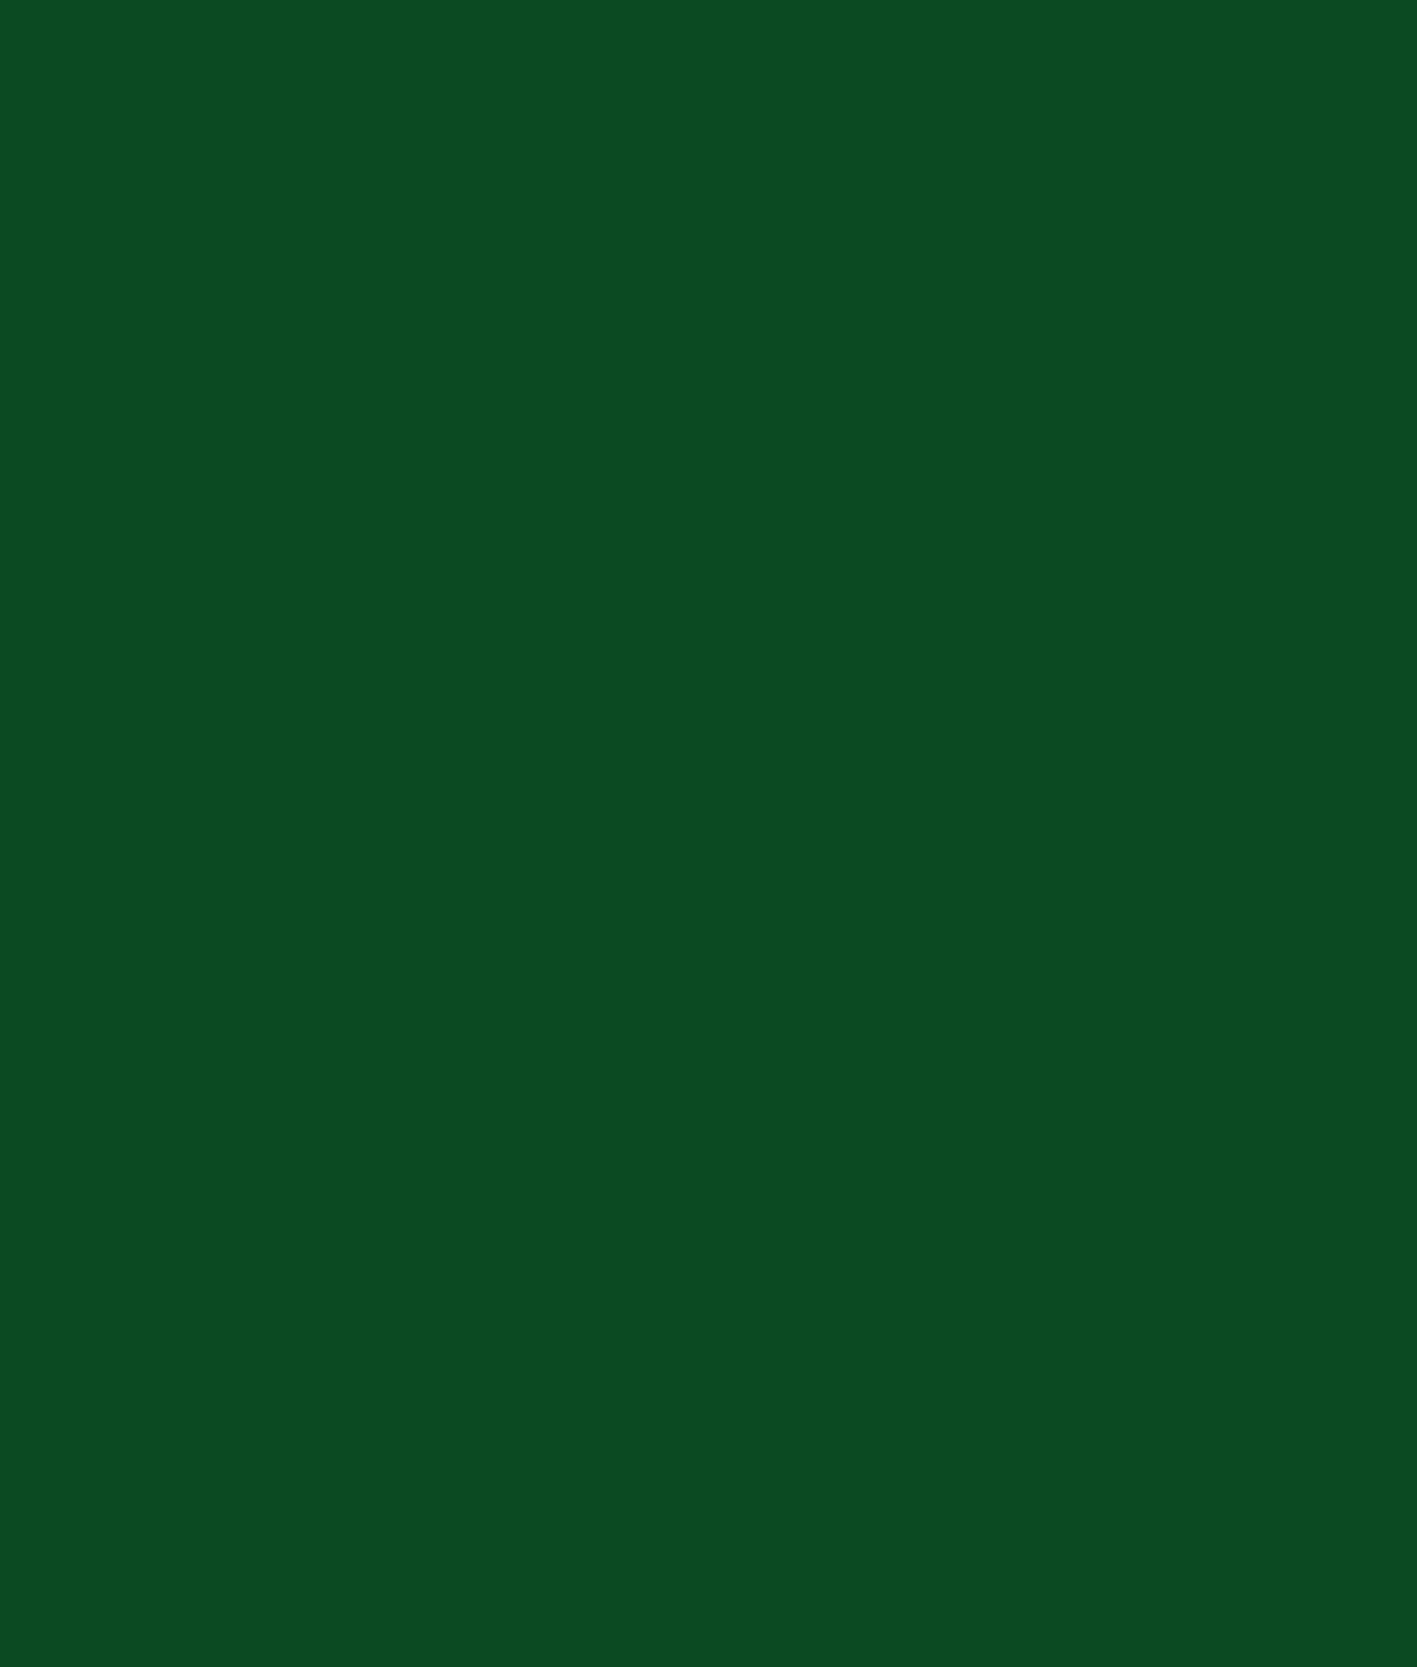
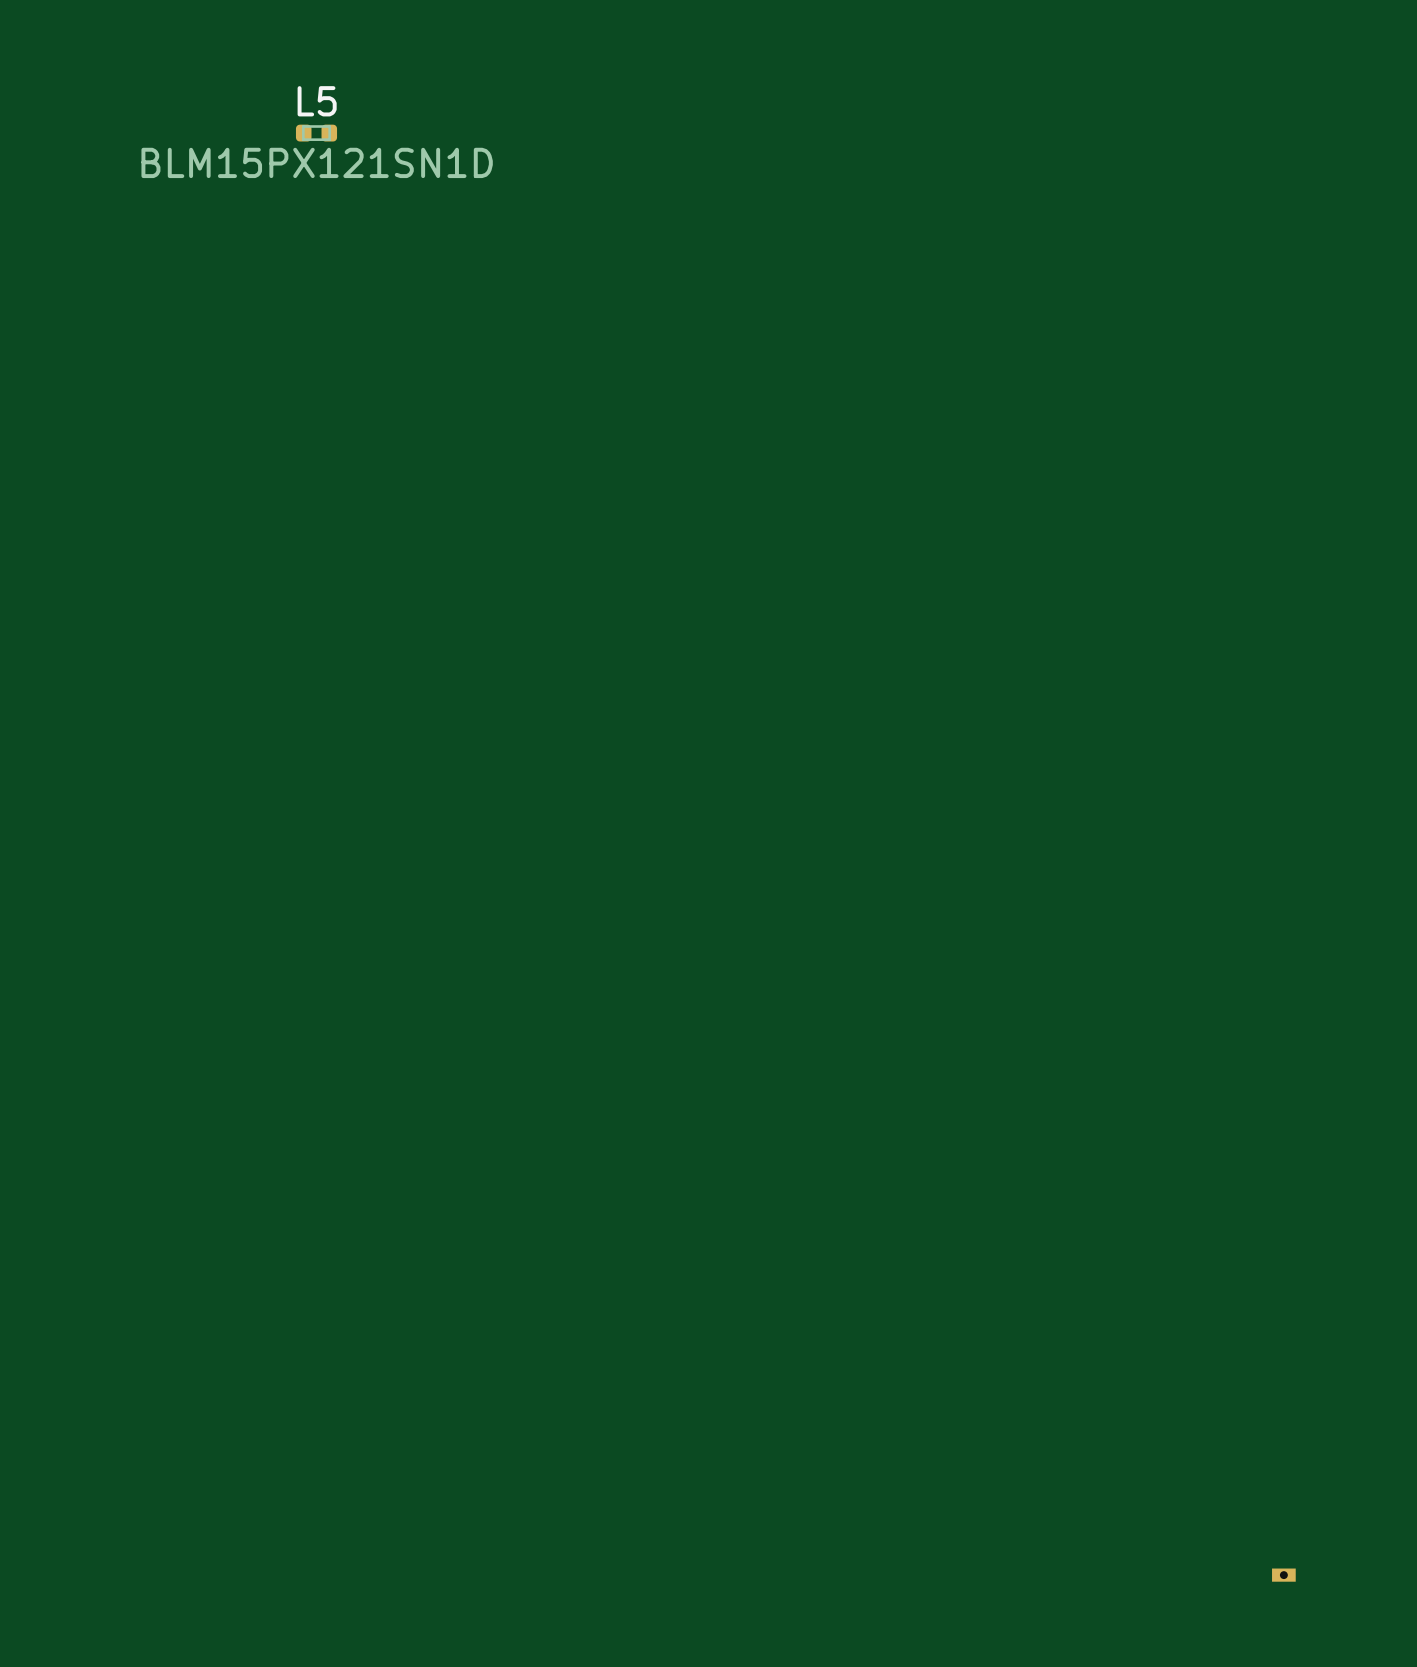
L5: none -> BLM15PX121SN1D (316, 133)
part: none -> (1283, 1575)

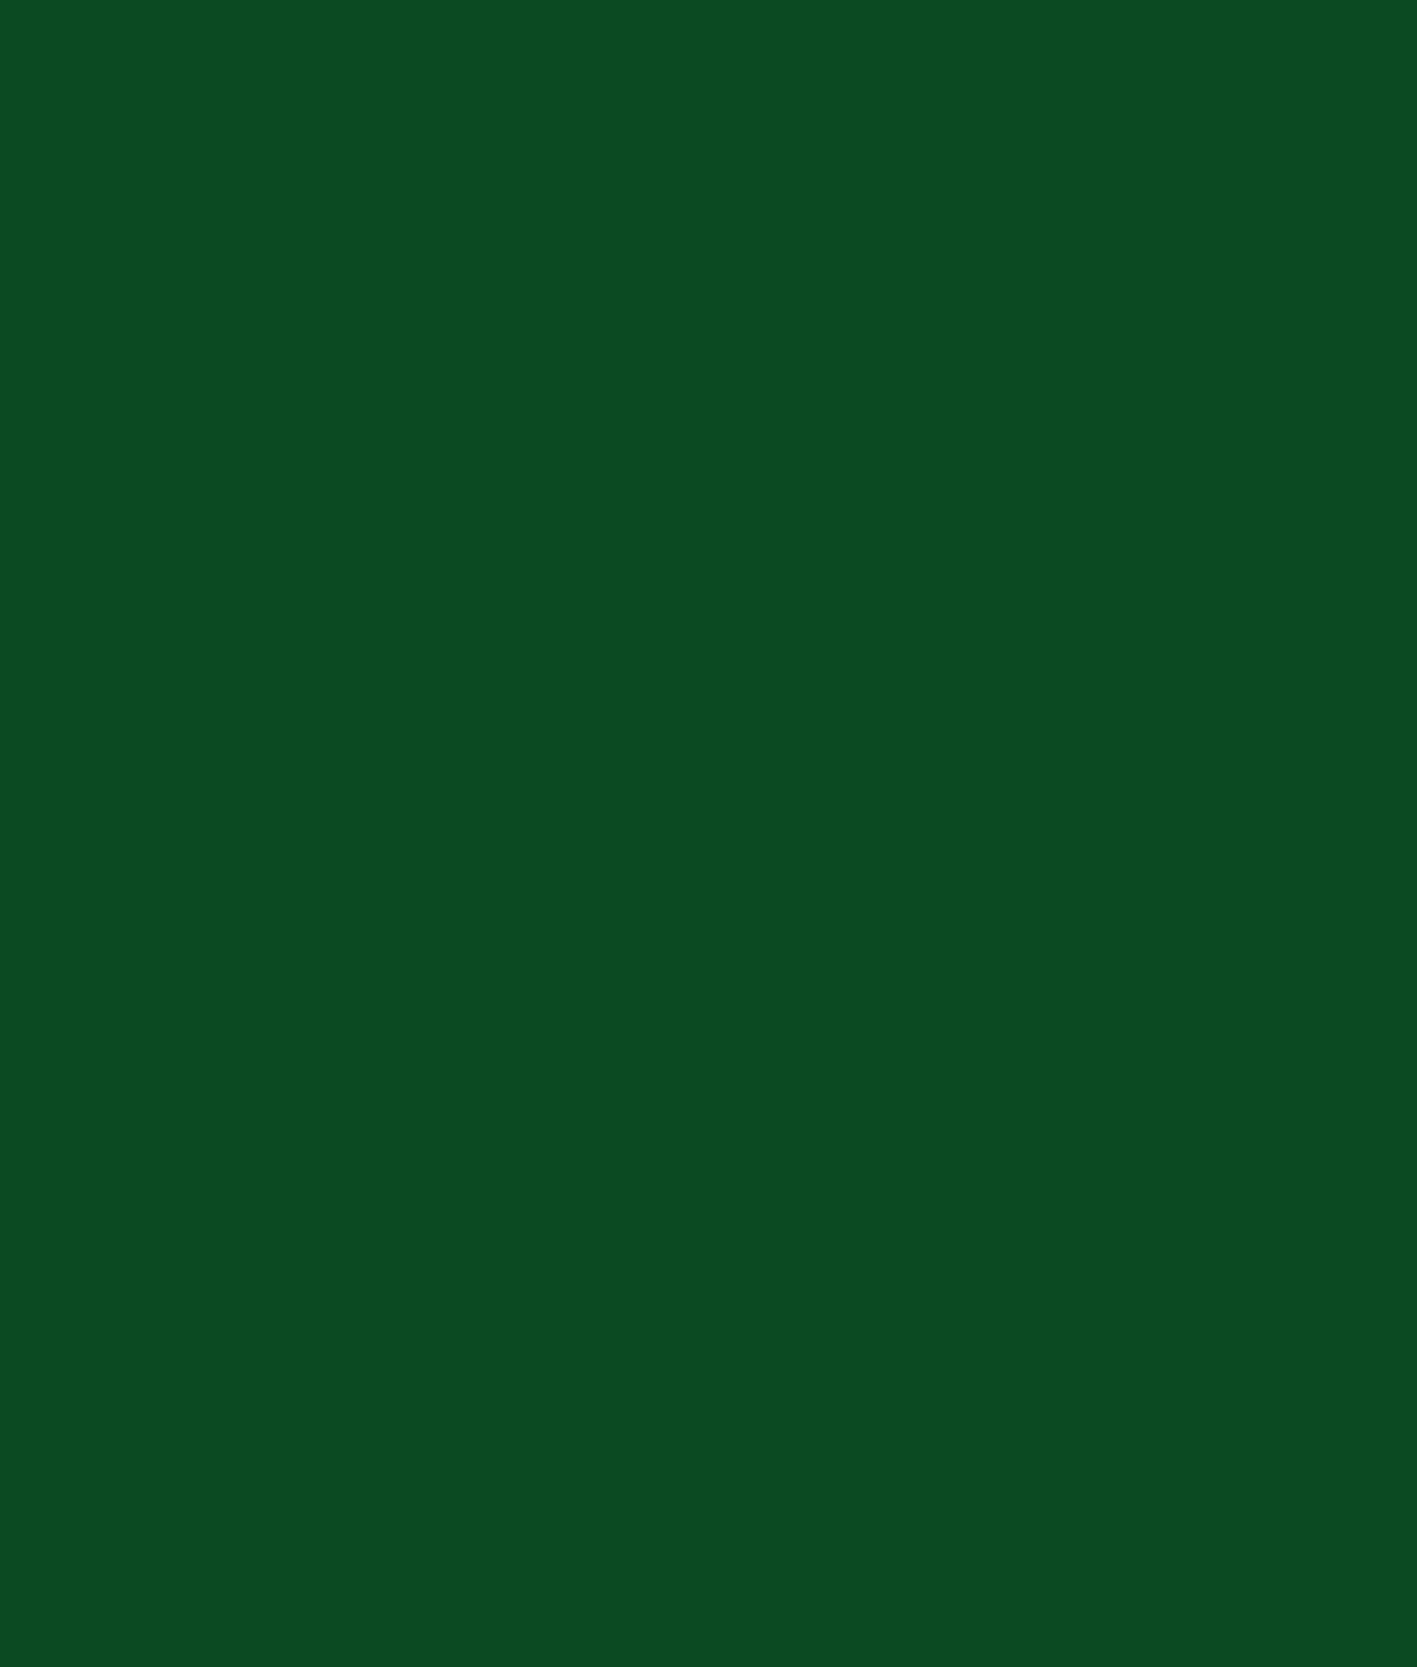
L5: BLM15PX121SN1D (316, 133) -> none
part: (1283, 1575) -> none

